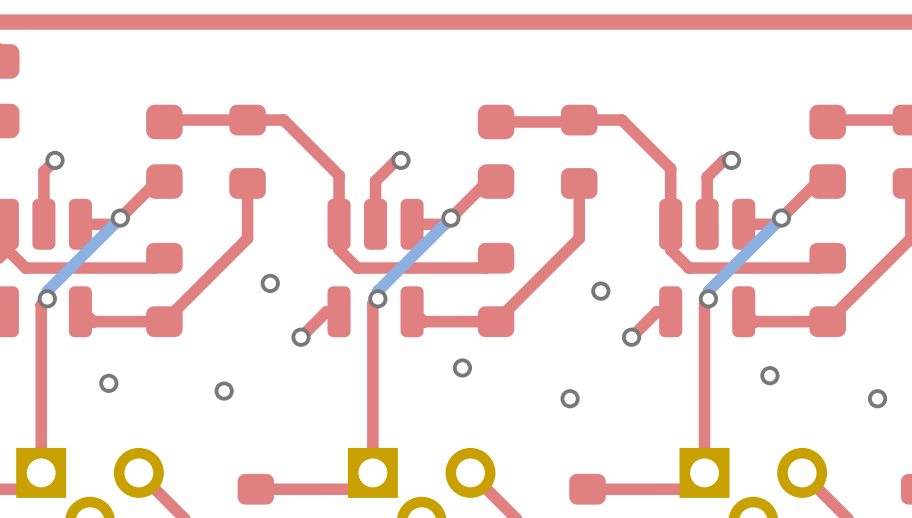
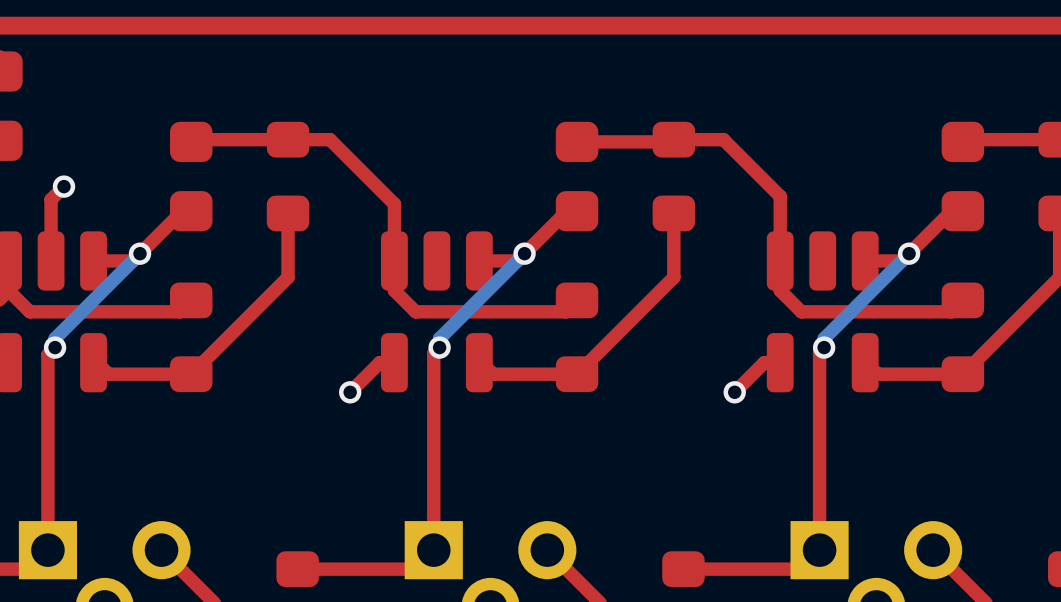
top track: (400, 160) (396, 160) (375, 181) (375, 224) -> none
via: (400, 160) -> none
top track: (731, 160) (723, 160) (707, 177) (707, 224) -> none
via: (731, 160) -> none
via: (270, 283) -> none
via: (600, 291) -> none
via: (462, 367) -> none
via: (769, 375) -> none
via: (108, 383) -> none
via: (224, 391) -> none
via: (570, 398) -> none
via: (877, 398) -> none

